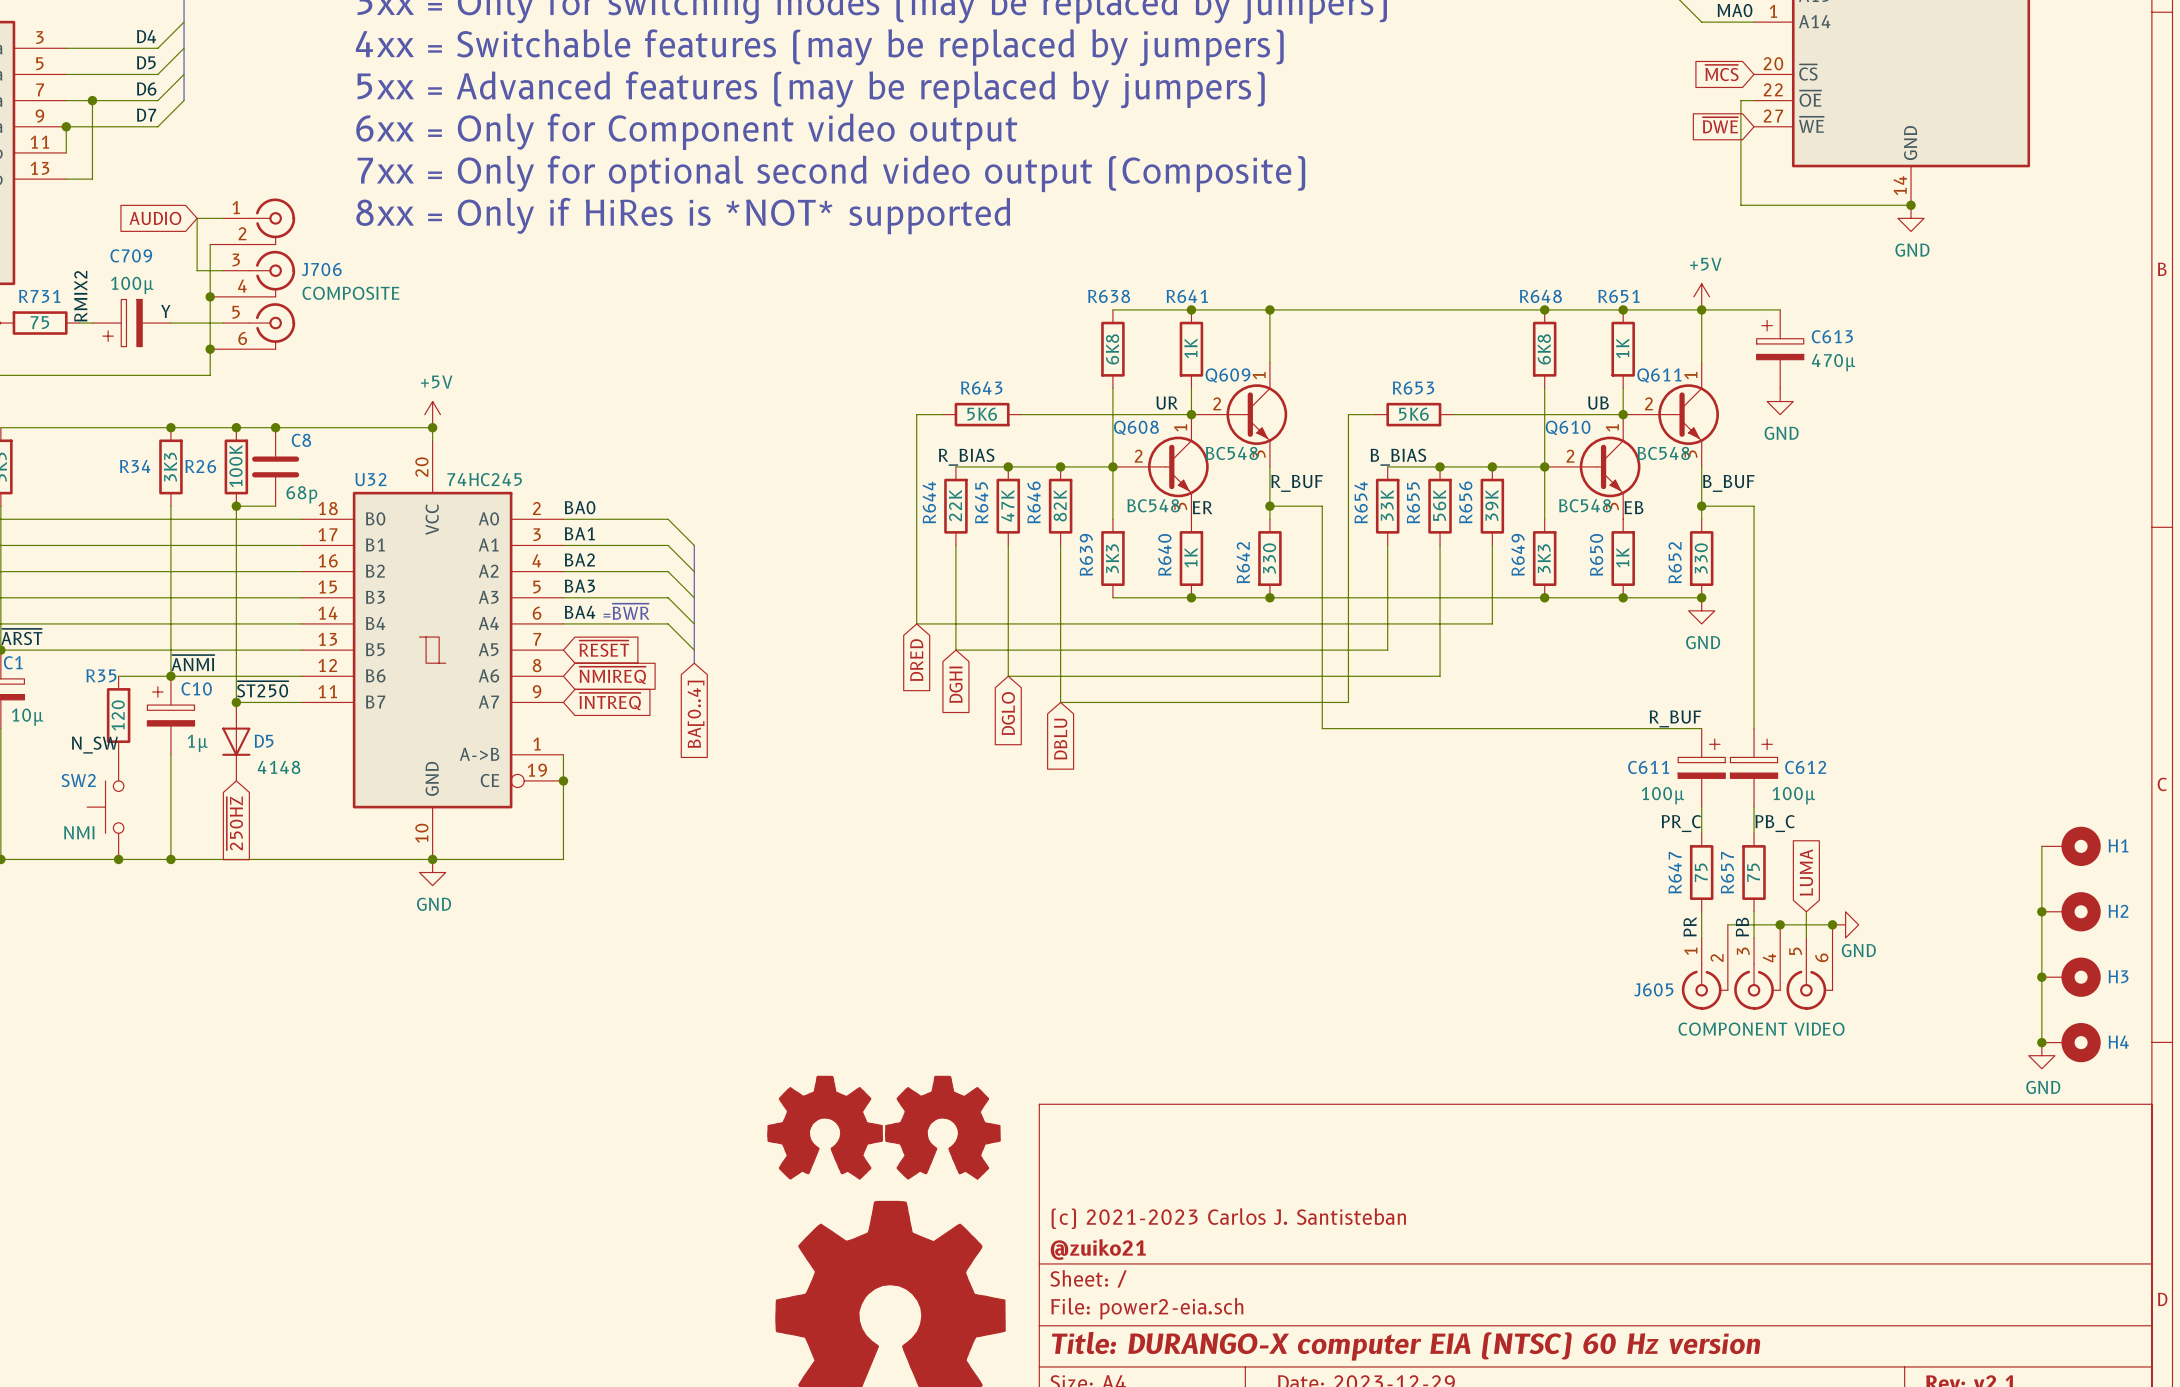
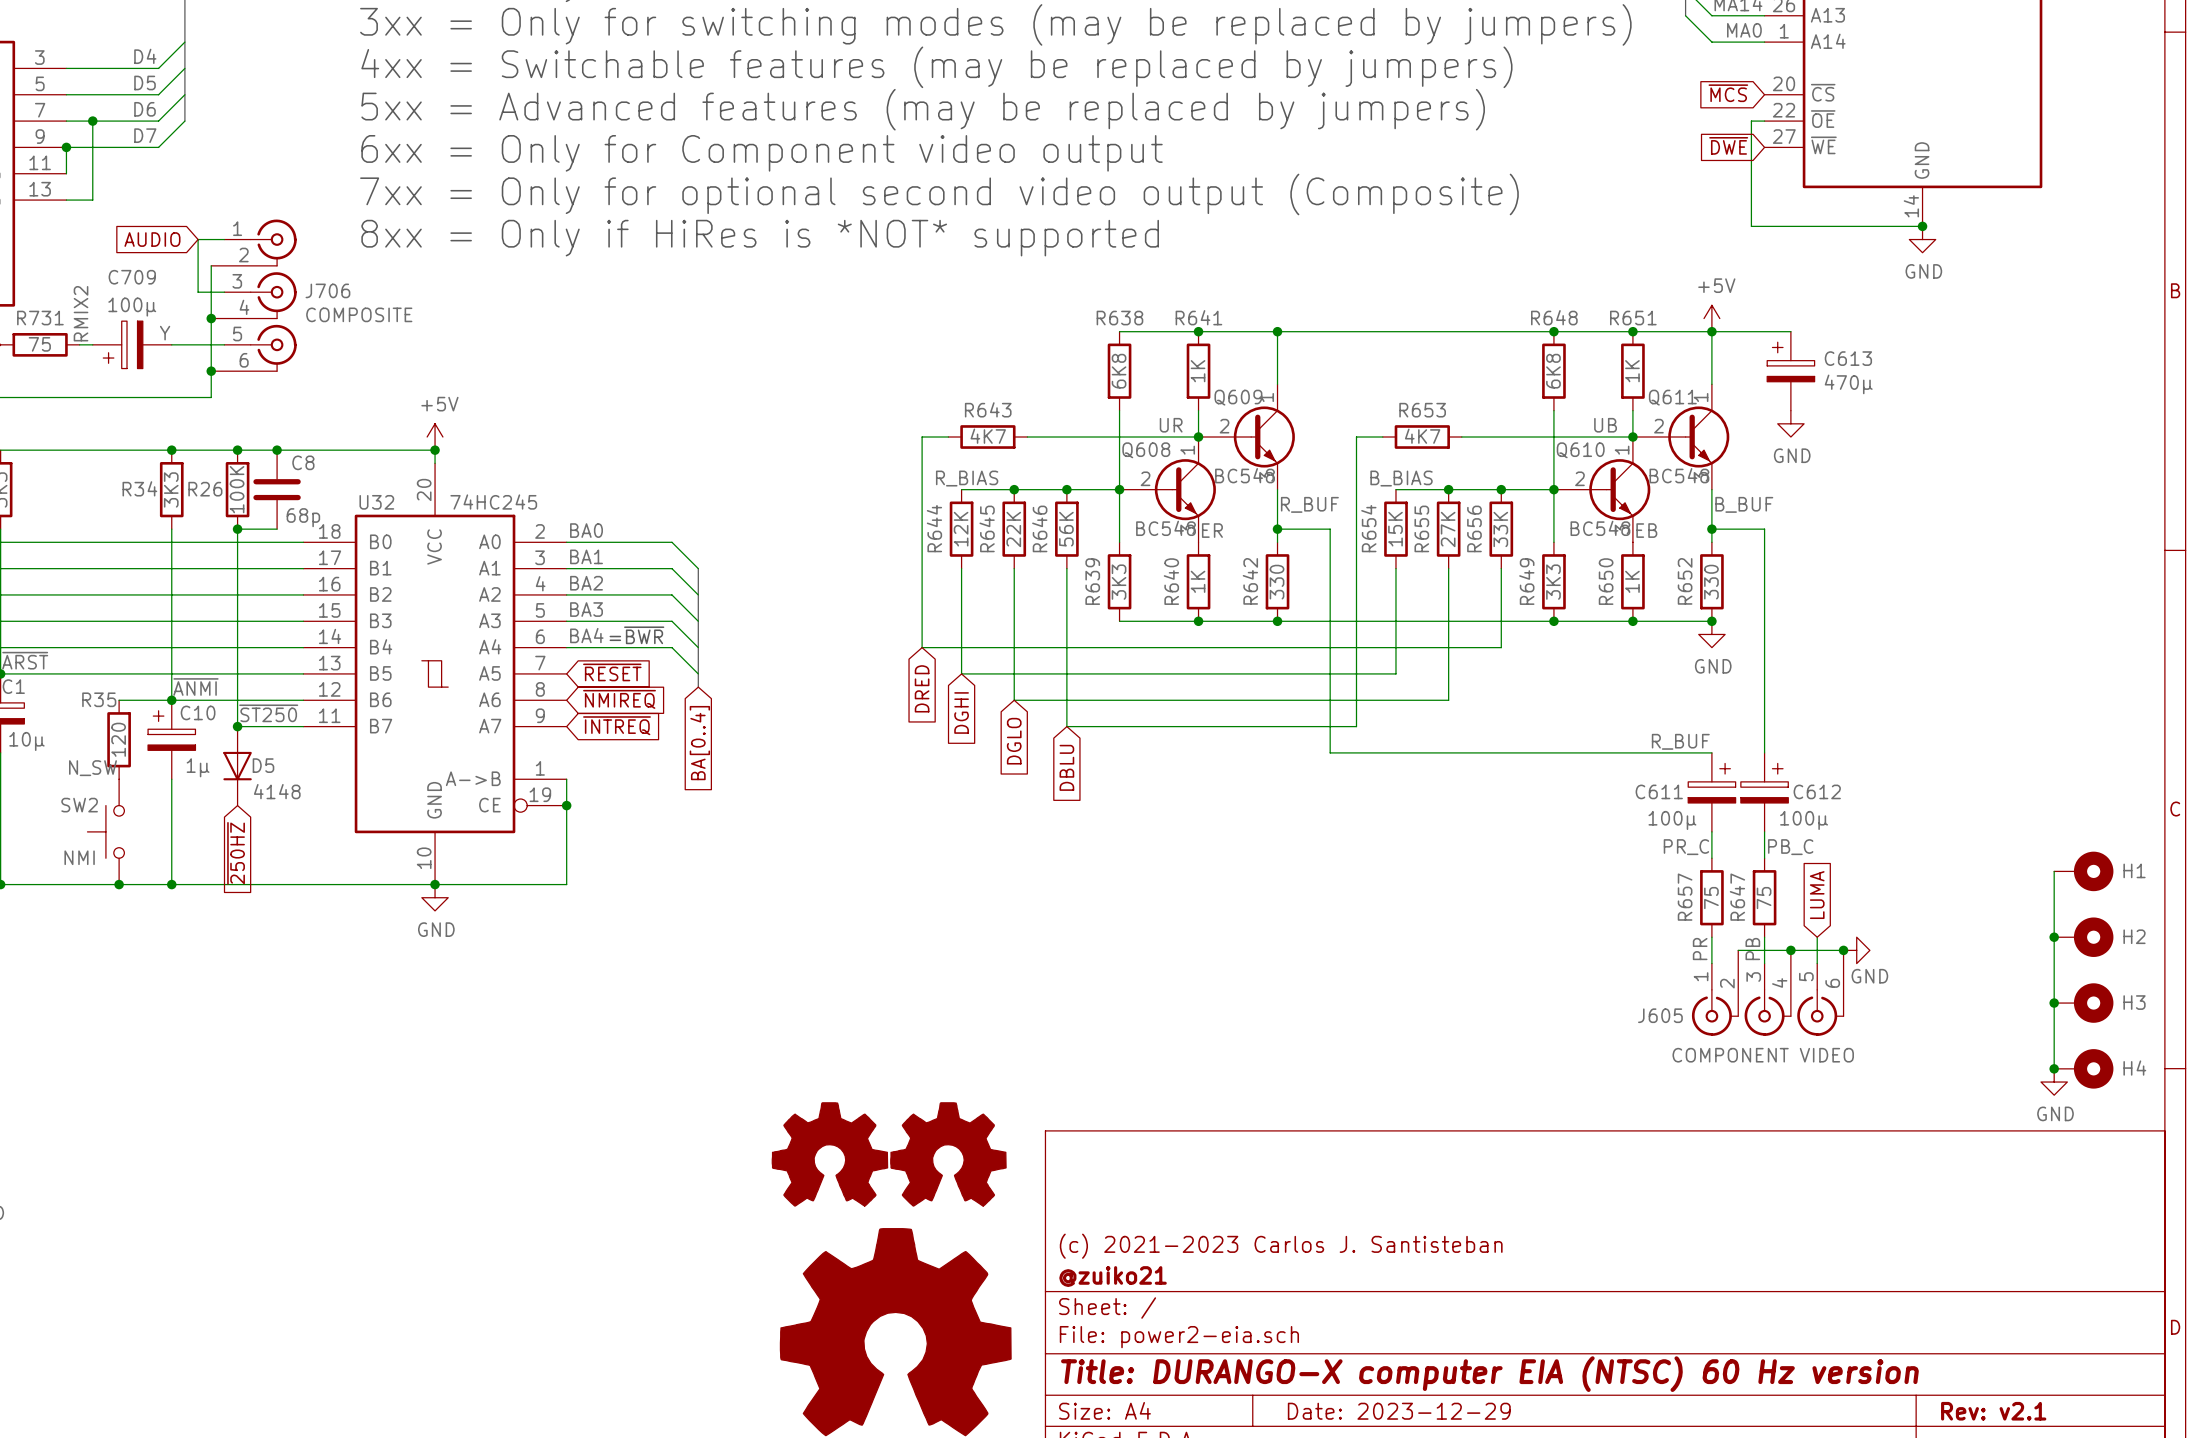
R643 value: 5K6 (982, 414) -> 4K7 (988, 436)
R653 value: 5K6 (1413, 414) -> 4K7 (1422, 436)
R644 value: 22K (955, 505) -> 12K (961, 529)
R645 value: 47K (1007, 505) -> 22K (1013, 529)
R646 value: 82K (1060, 505) -> 56K (1066, 529)
R654 value: 33K (1387, 505) -> 15K (1395, 529)
R655 value: 56K (1439, 505) -> 27K (1448, 529)
R656 value: 39K (1491, 505) -> 33K (1500, 529)
R647 name: R647 (1675, 872) -> R657 (1685, 897)
R657 name: R657 (1727, 872) -> R647 (1737, 897)

